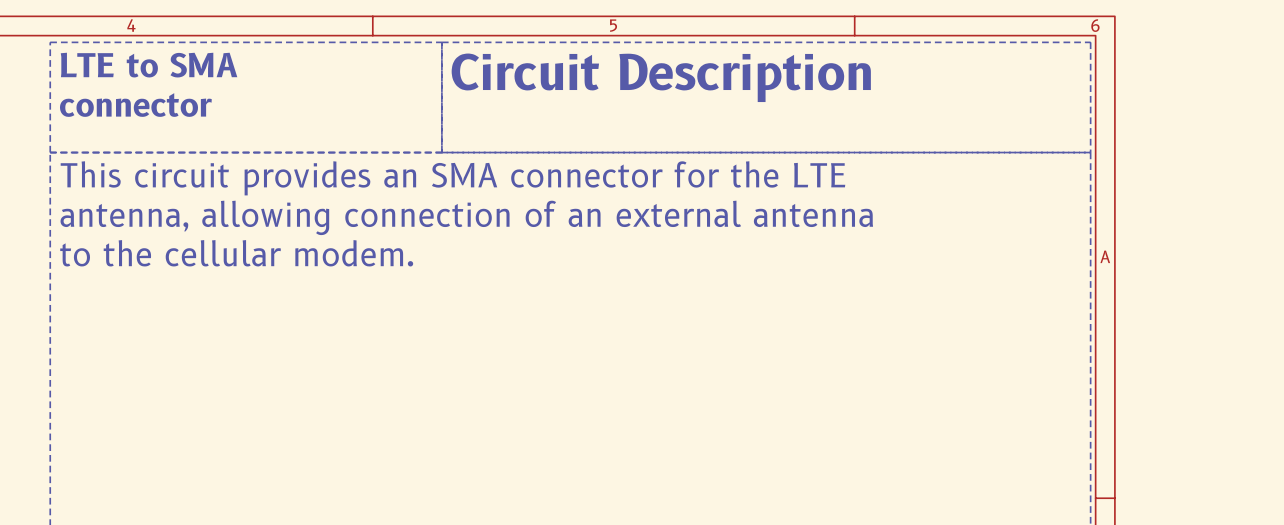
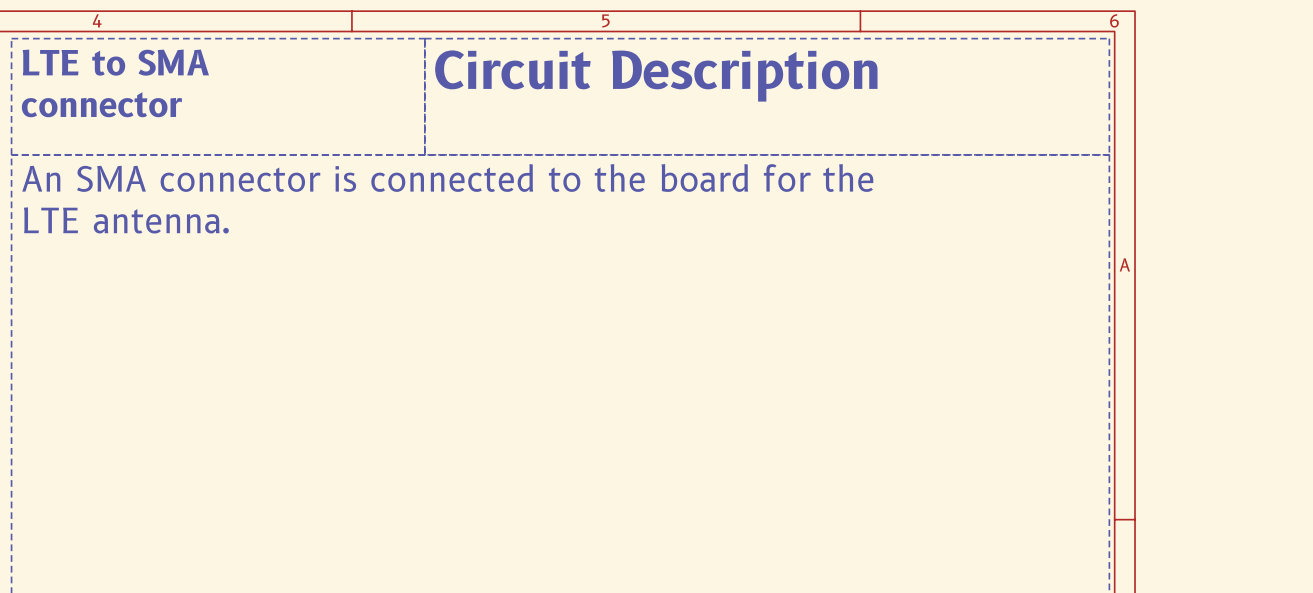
text: This circuit provides an SMA connector for the LTE (452, 178) -> An SMA connector is connected to the board for the (447, 177)
text: antenna, allowing connection of an external antenna (466, 217) -> LTE antenna. (126, 220)
text: to the cellular modem. (236, 253) -> none

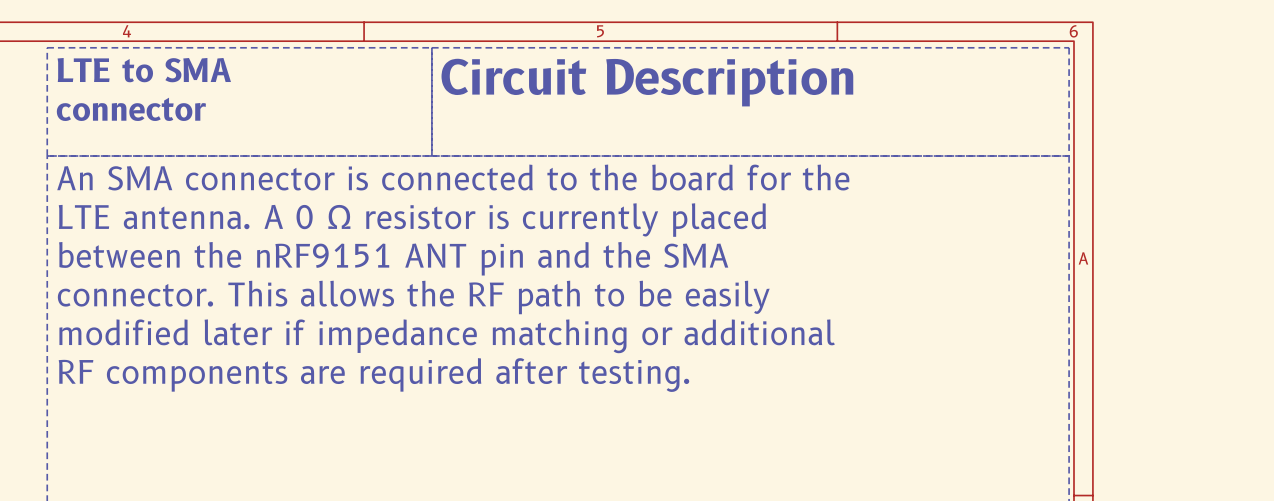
text: LTE antenna. (126, 220) -> LTE antenna. A 0 Ω resistor is currently placed (412, 220)
text: none -> between the nRF9151 ANT pin and the SMA (393, 258)
text: none -> connector. This allows the RF path to be easily (413, 297)
text: none -> modified later if impedance matching or additional (447, 336)
text: none -> RF components are required after testing. (373, 375)

